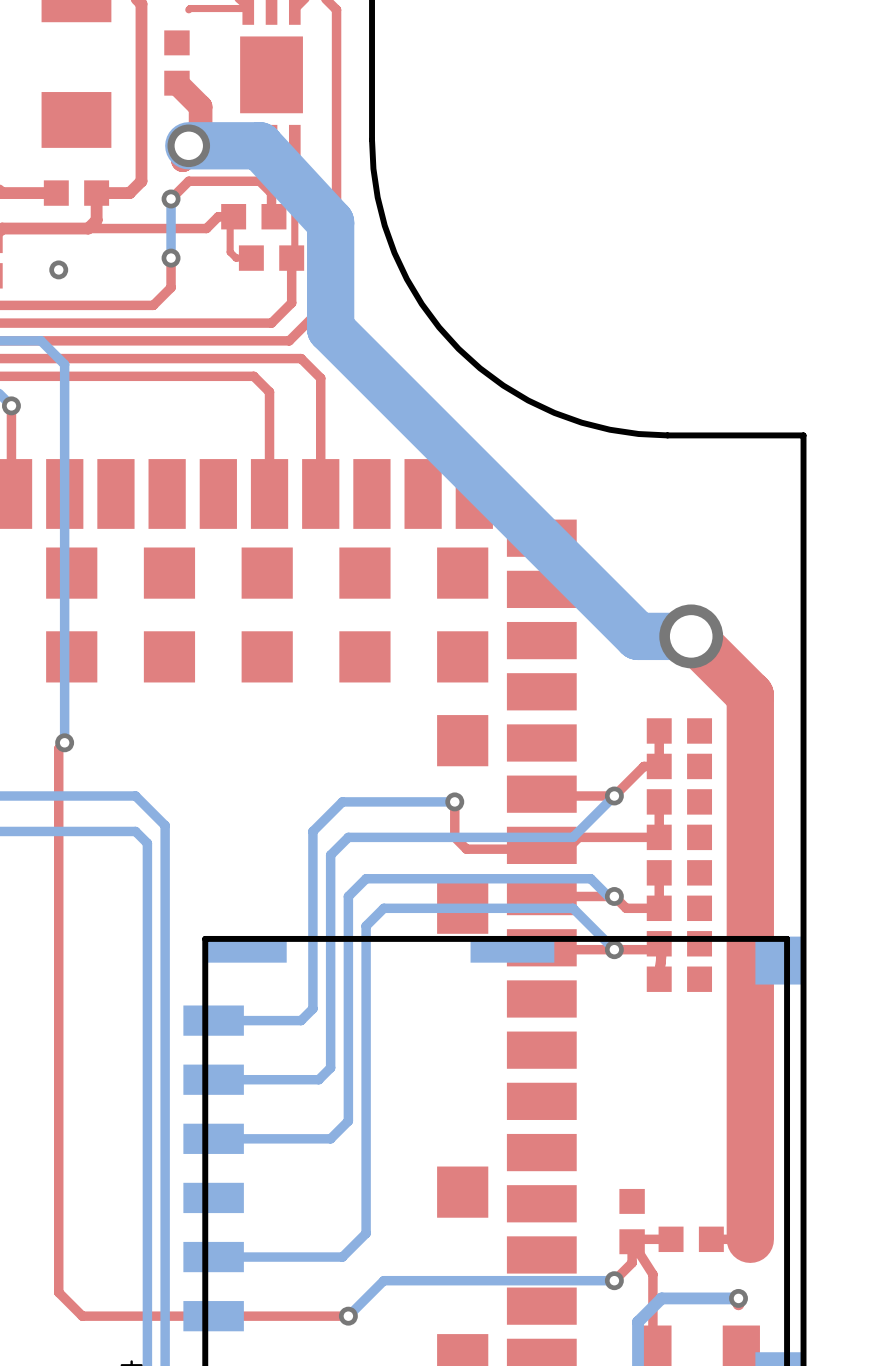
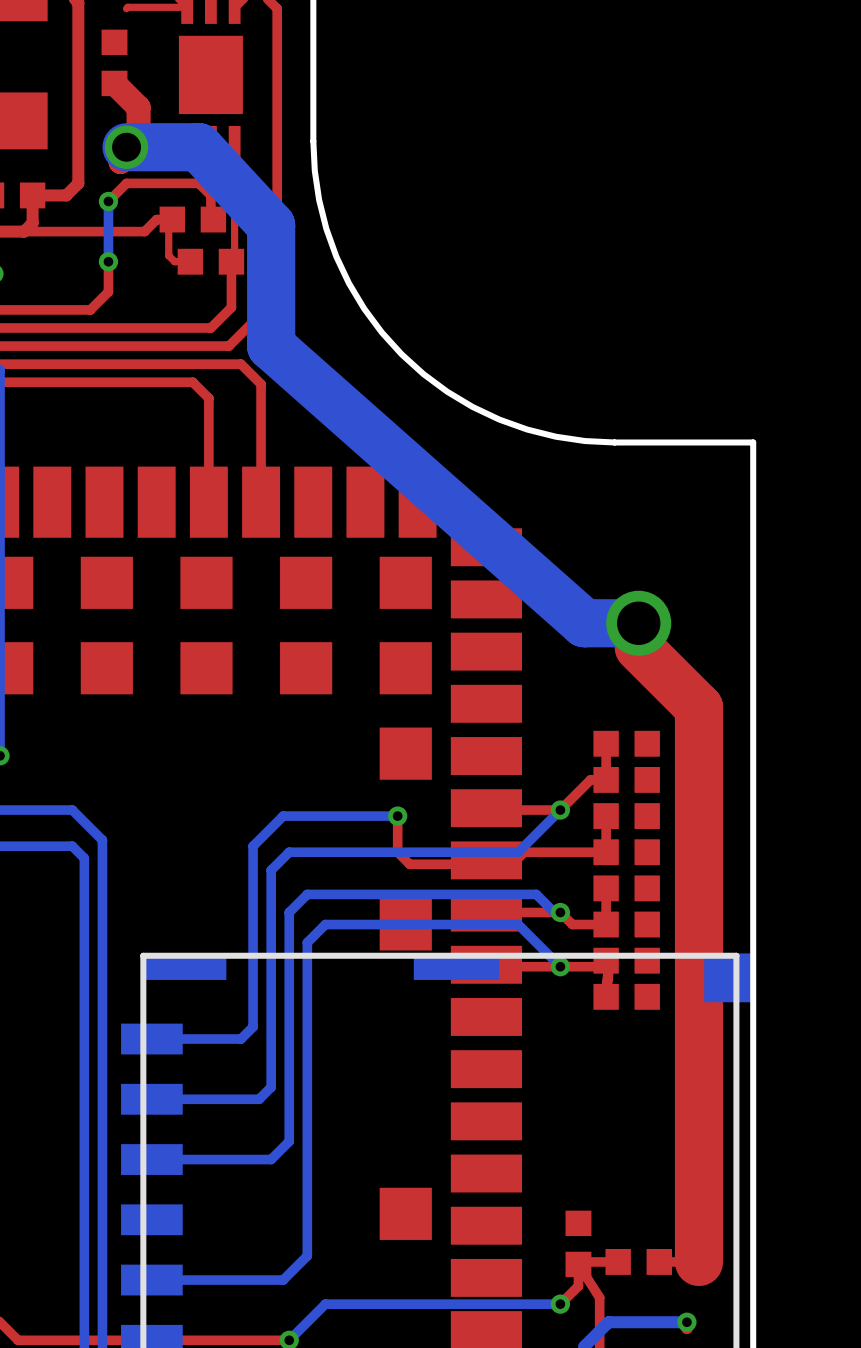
bottom track: (330, 329) (638, 636) (691, 636) -> (271, 334) (271, 346) (584, 623) (638, 623)
via position: (691, 636) -> (638, 623)

